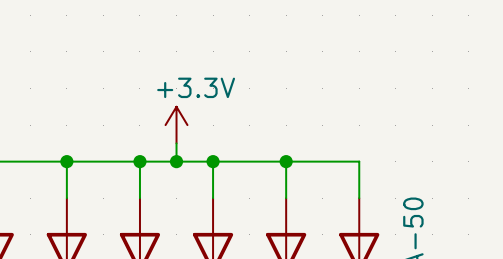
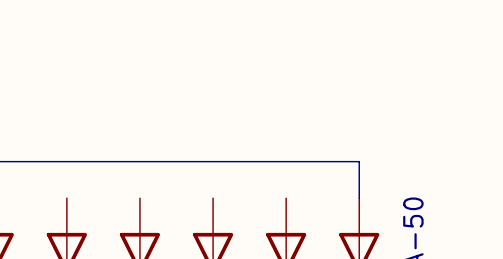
power symbol: +3.3V (176, 125) -> none
wire: (176, 143) (176, 161) -> none
wire: (66, 161) (66, 198) -> none
junction: (66, 161) -> none
wire: (139, 161) (139, 198) -> none
junction: (139, 161) -> none
junction: (176, 161) -> none
wire: (213, 161) (213, 198) -> none
junction: (213, 161) -> none
wire: (286, 161) (286, 198) -> none
junction: (286, 161) -> none

